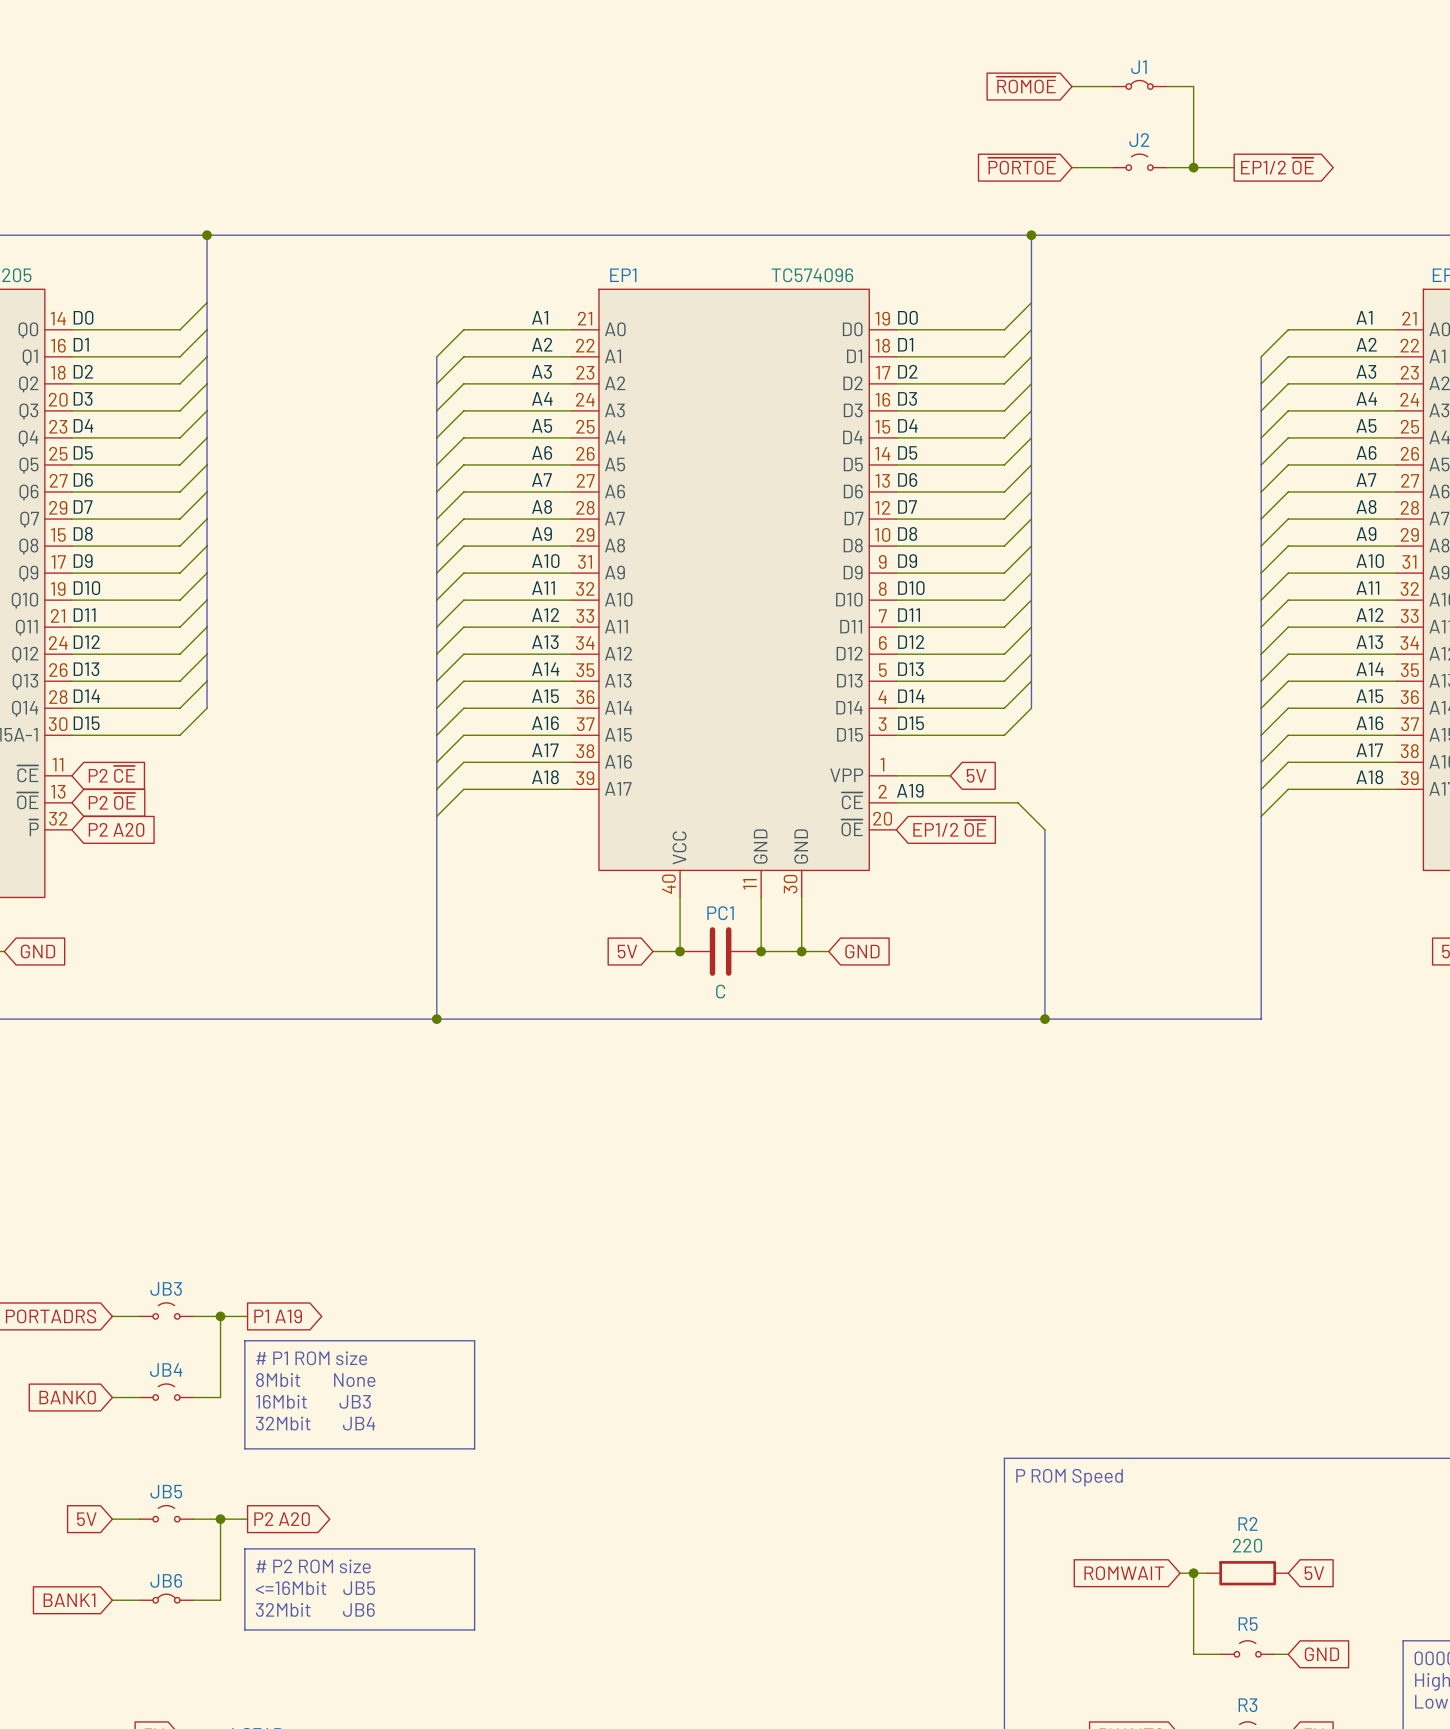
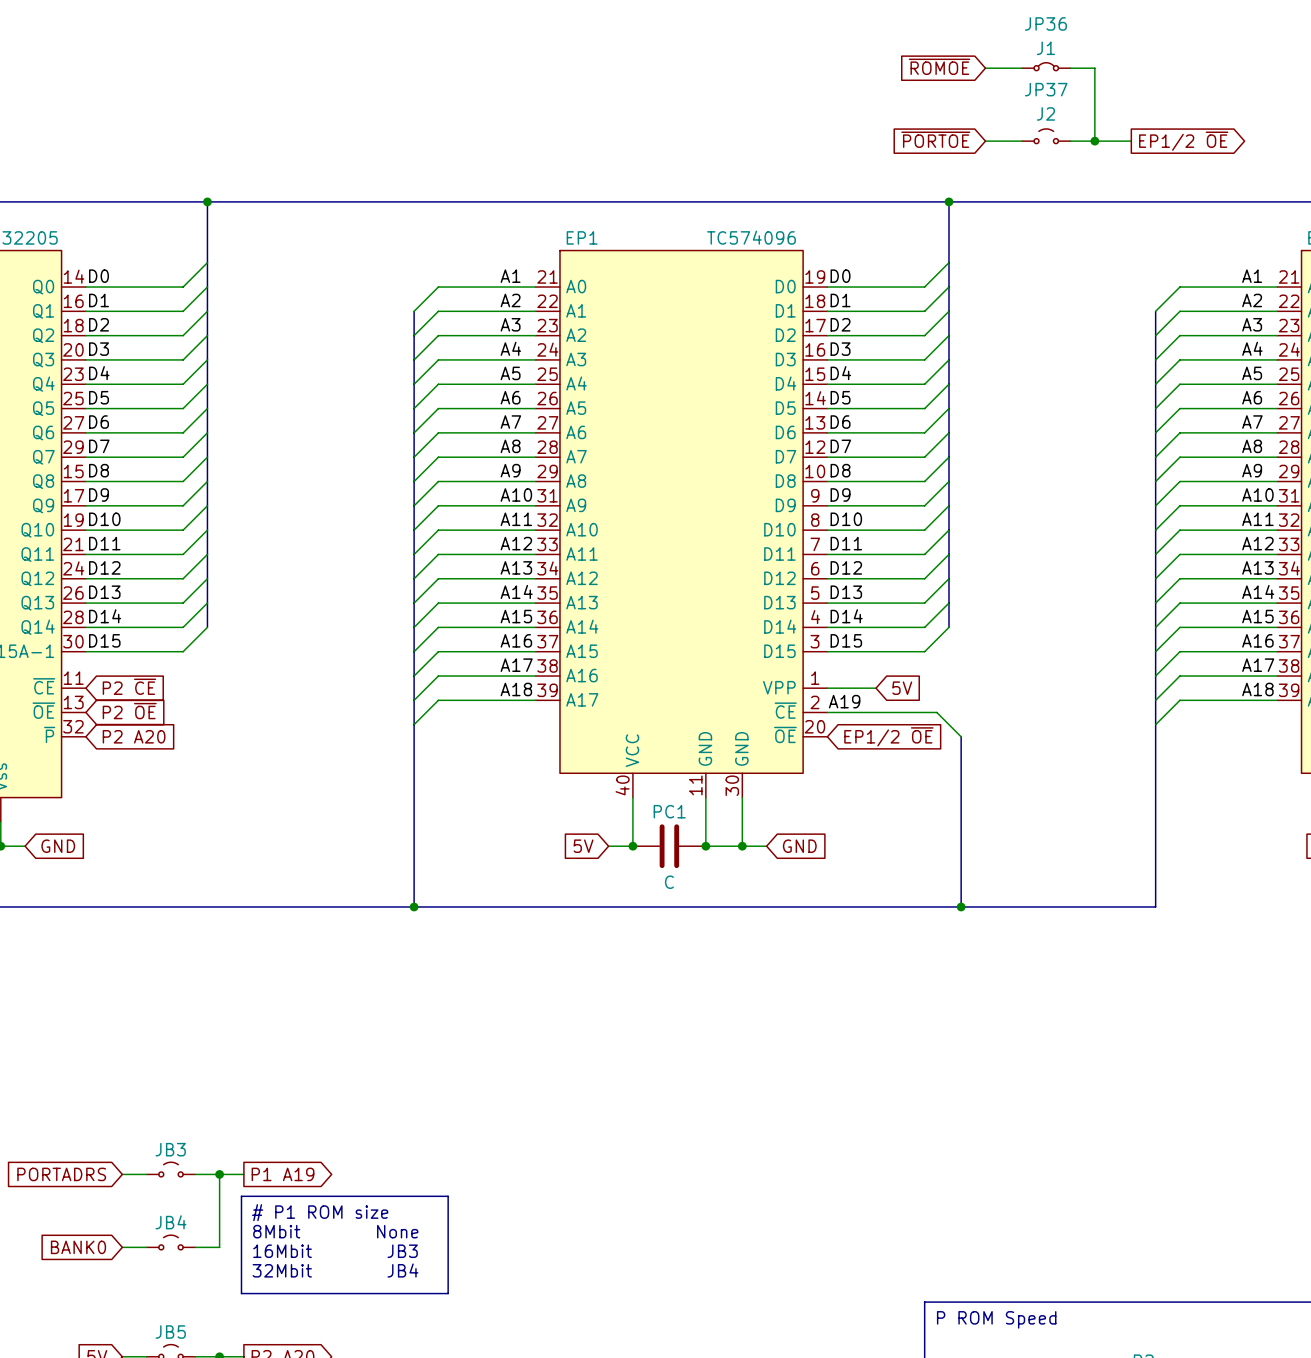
J1 value: none -> J1 (1045, 48)
J1 name: J1 (1138, 67) -> JP36 (1045, 23)
J2 value: none -> J2 (1045, 113)
J2 name: J2 (1139, 140) -> JP37 (1046, 89)

